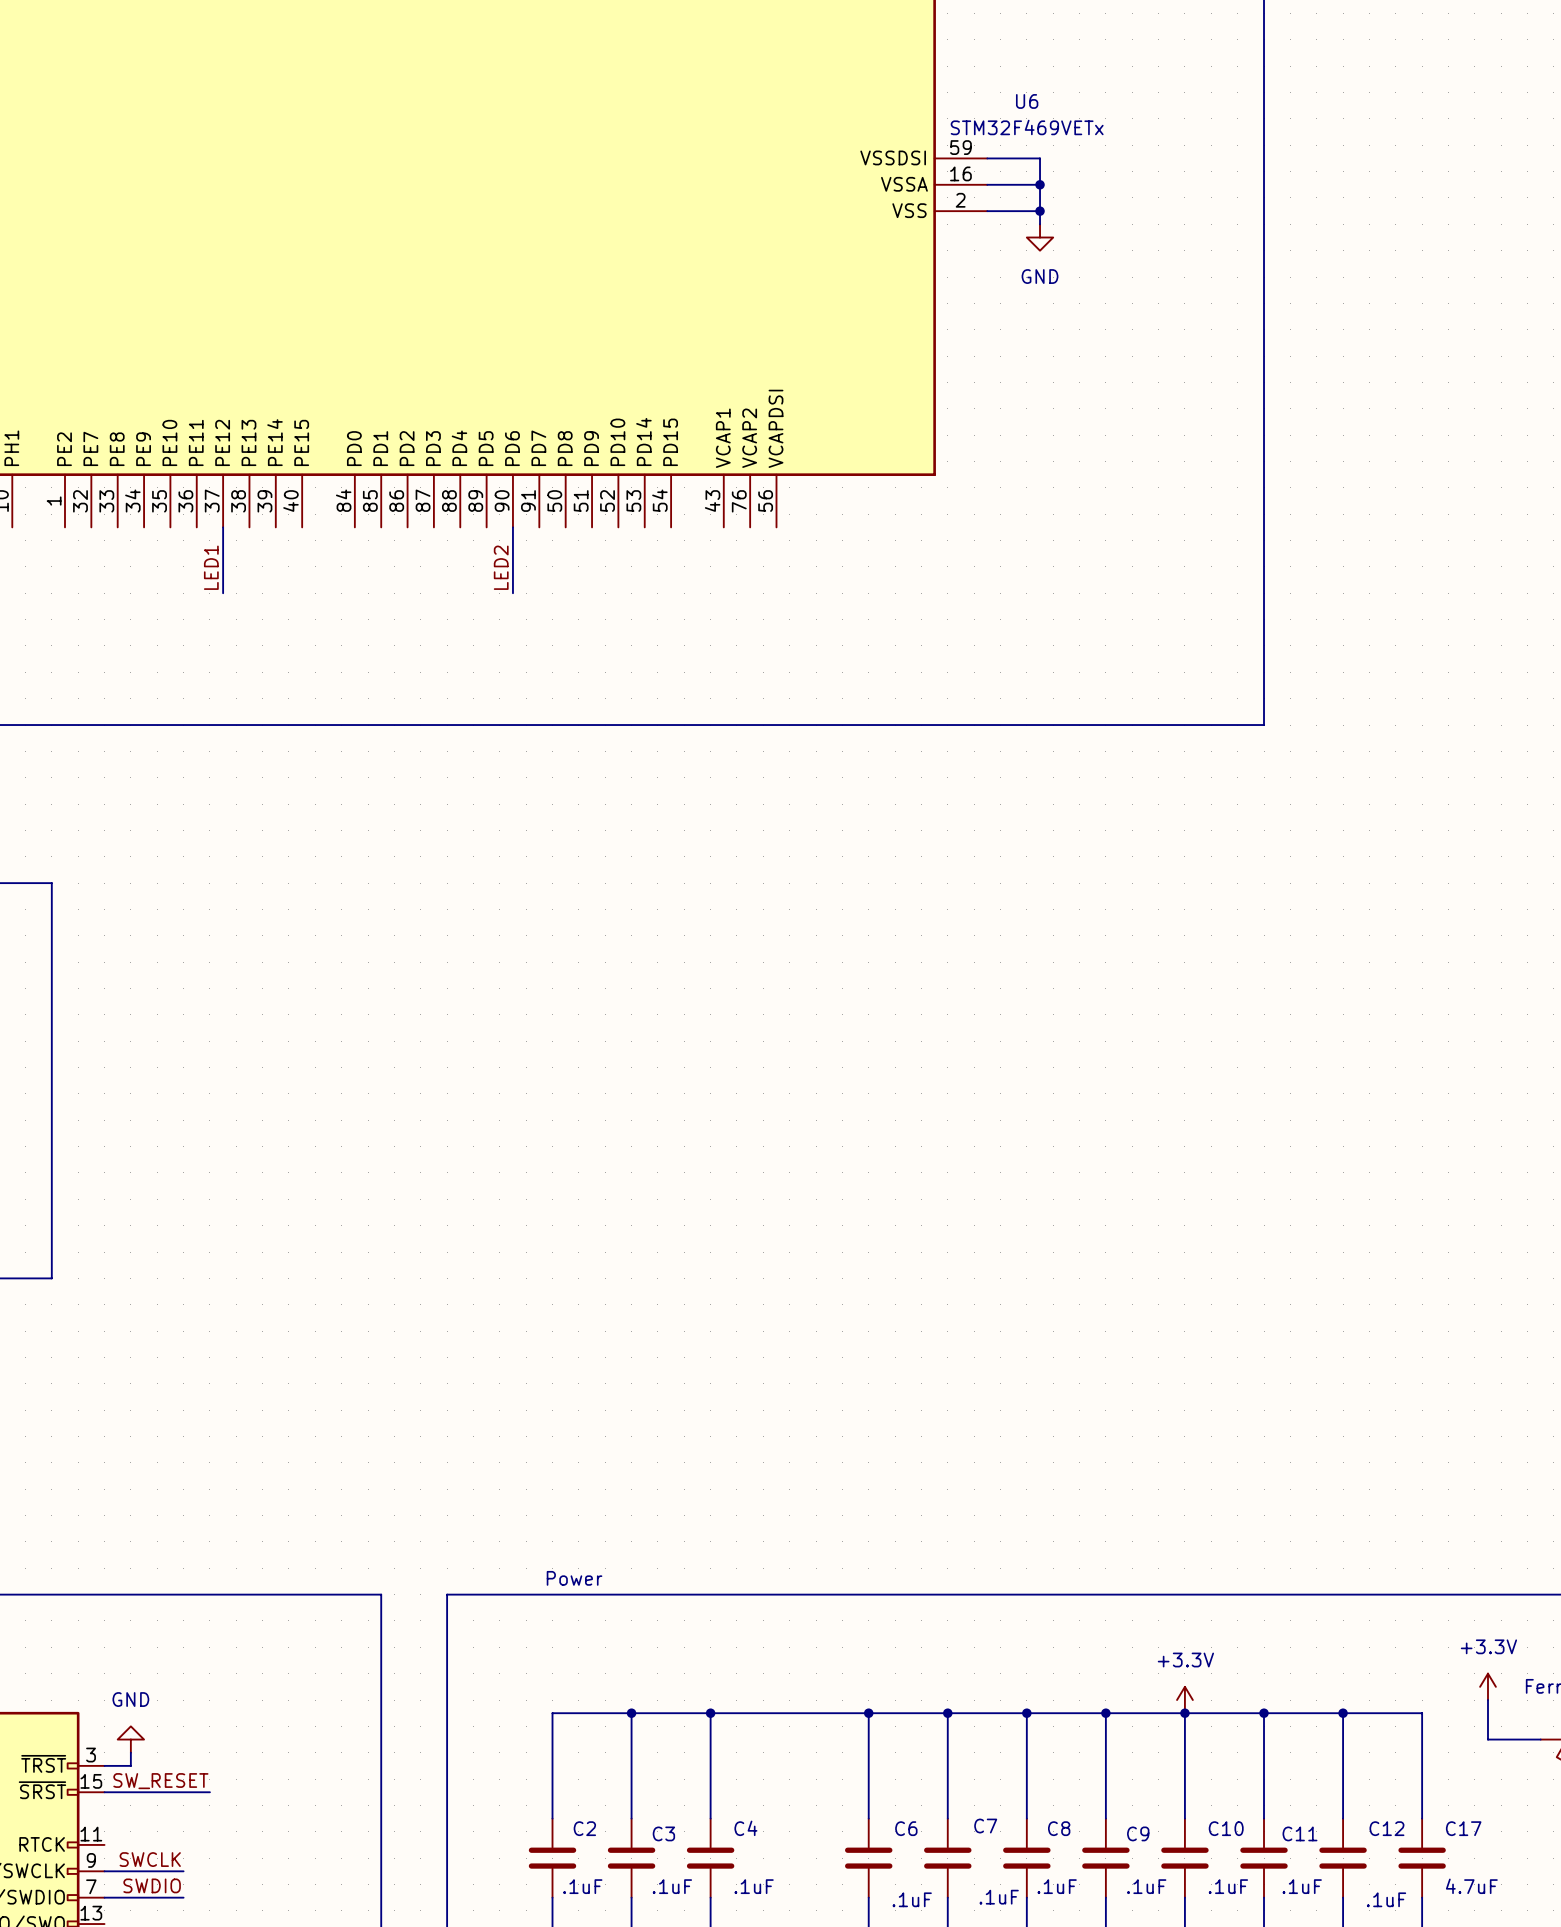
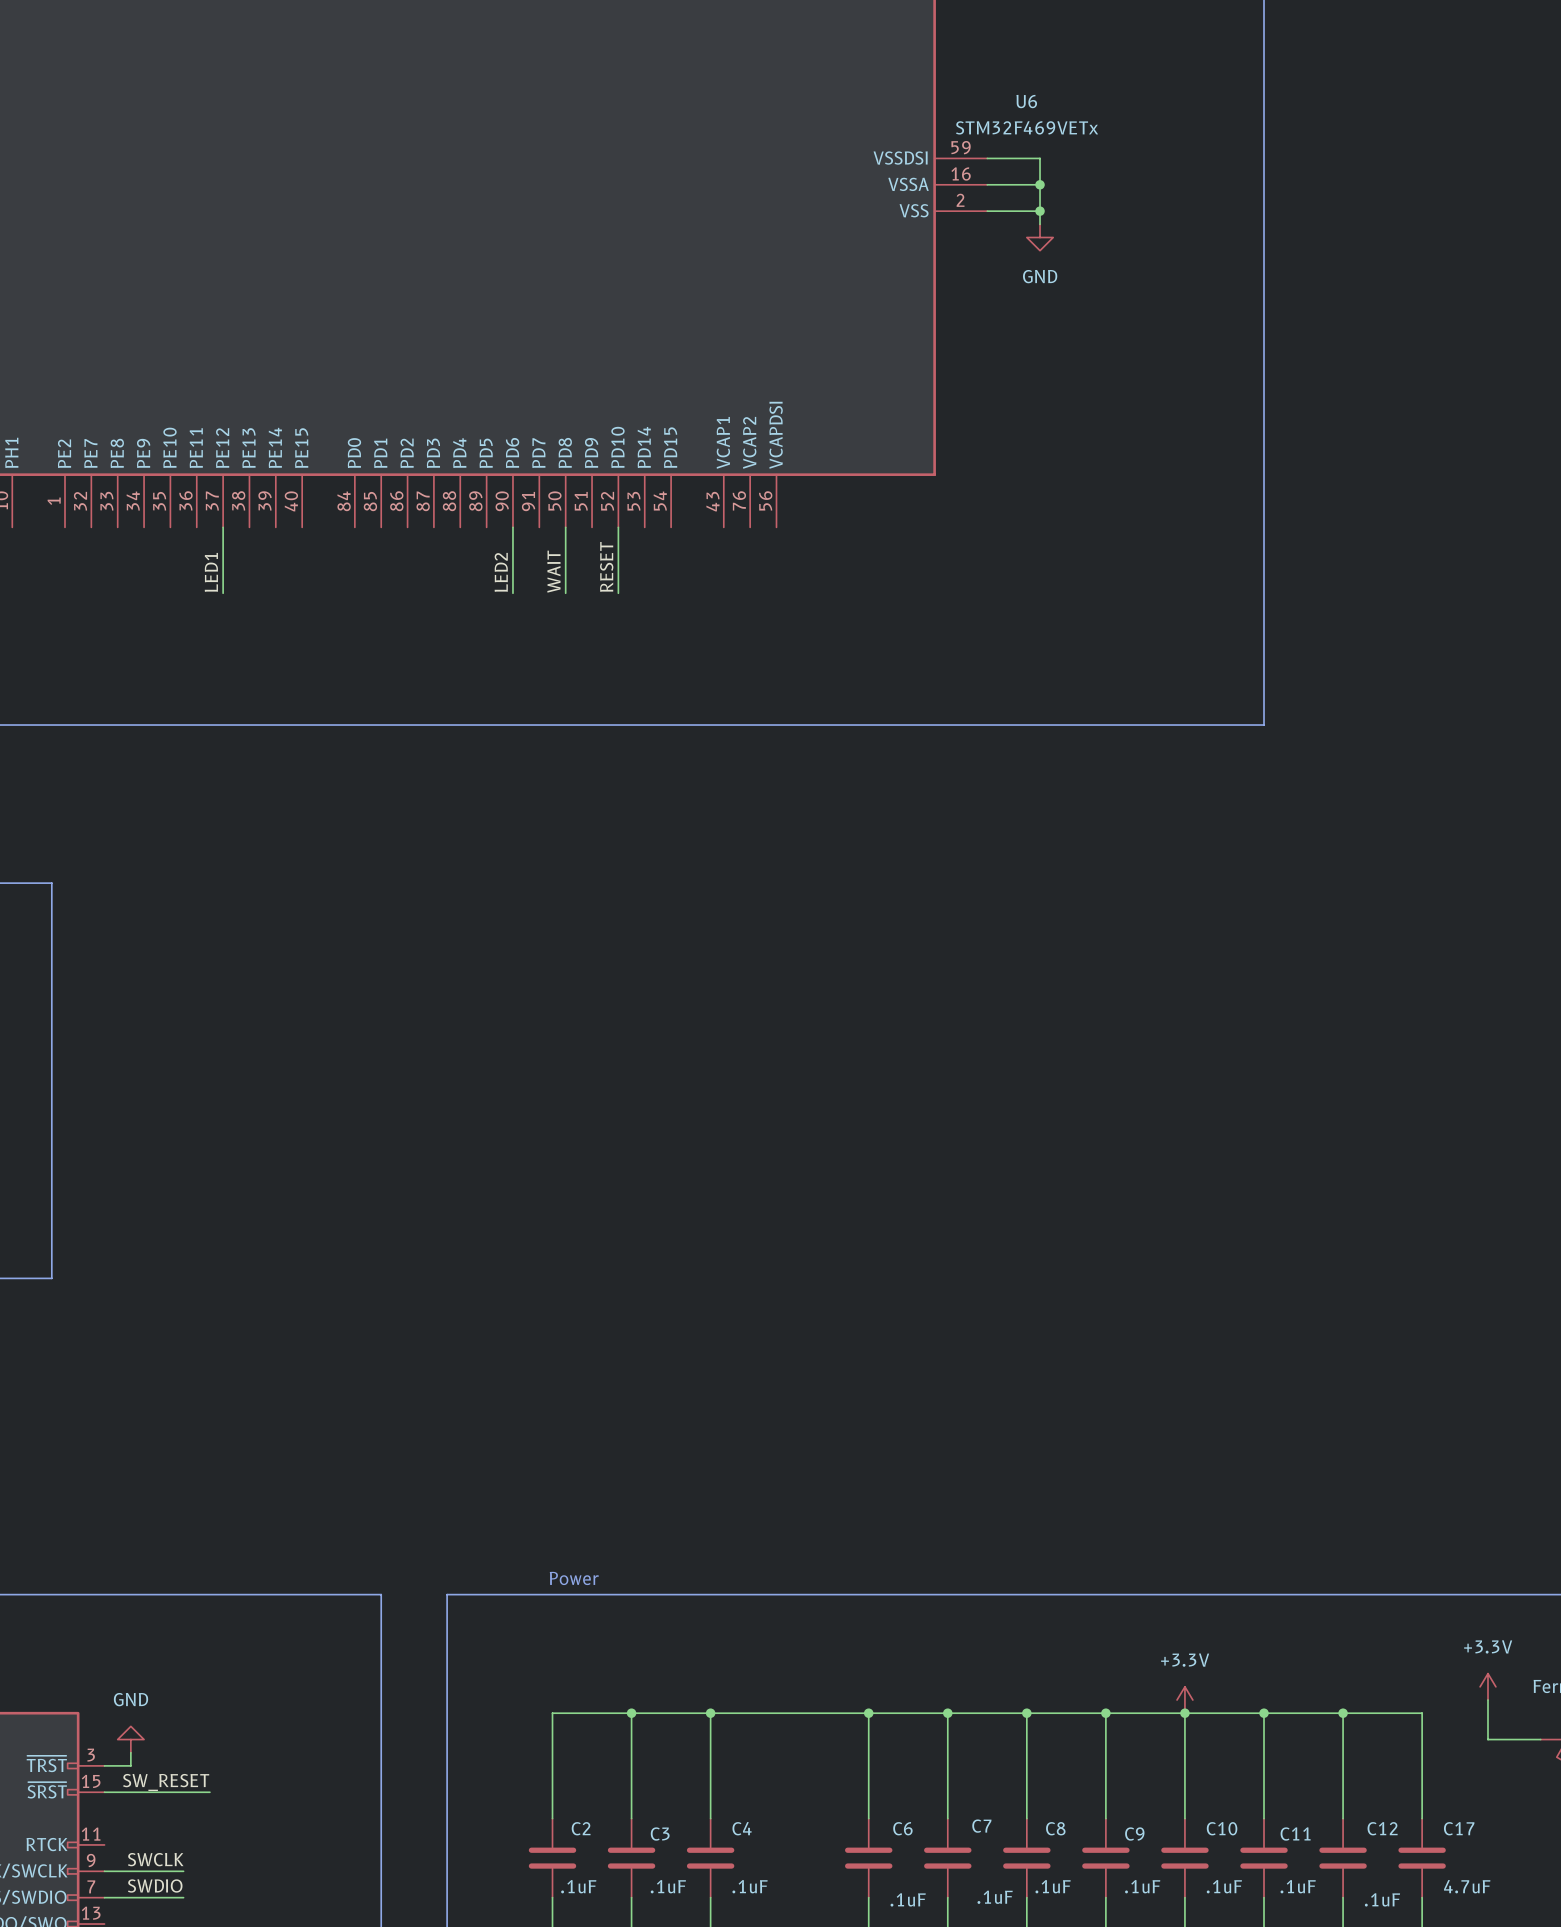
wire: none -> (565, 527) (565, 593)
wire: none -> (618, 527) (618, 593)
label: none -> RESET (606, 566)
label: none -> WAIT (553, 571)

